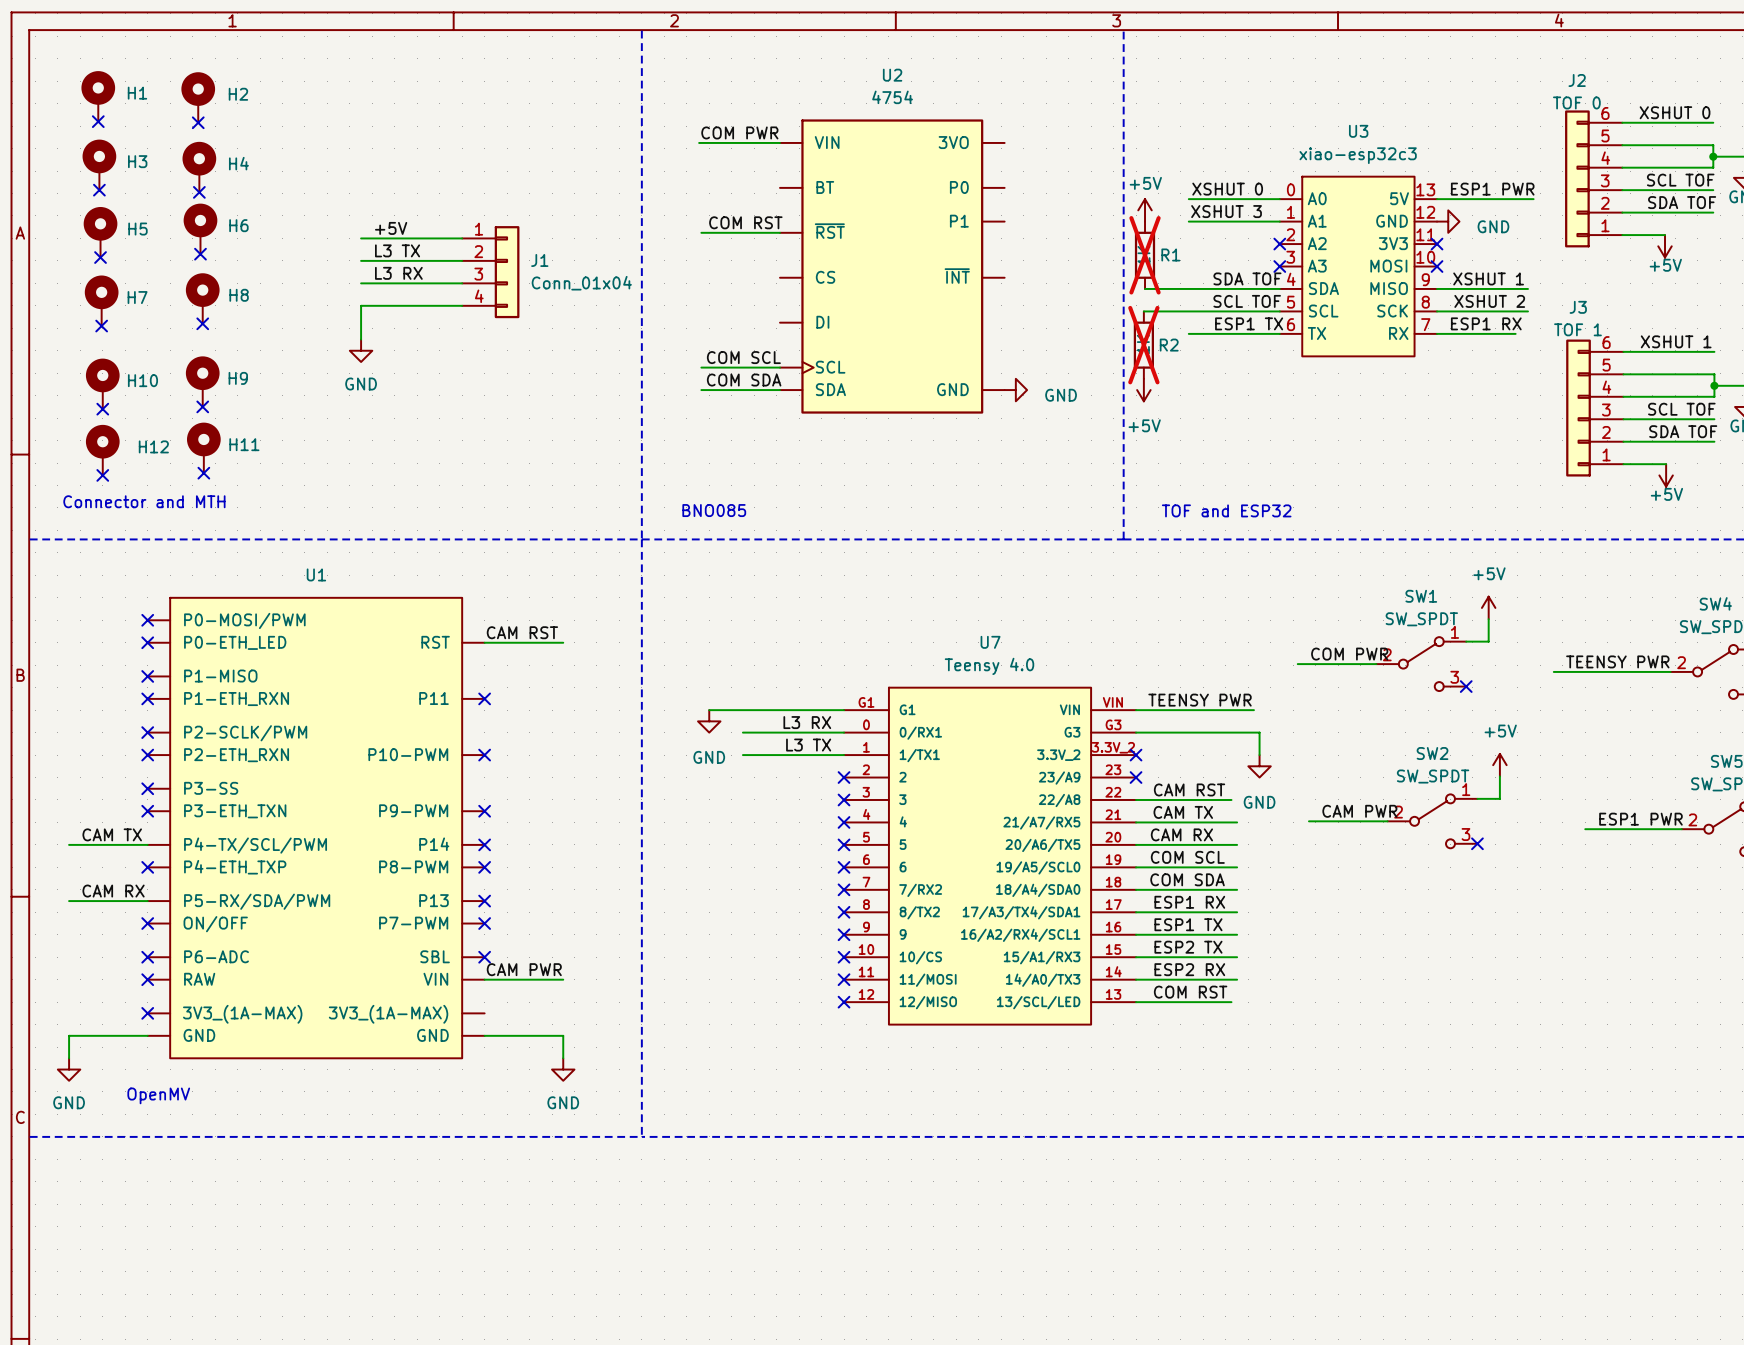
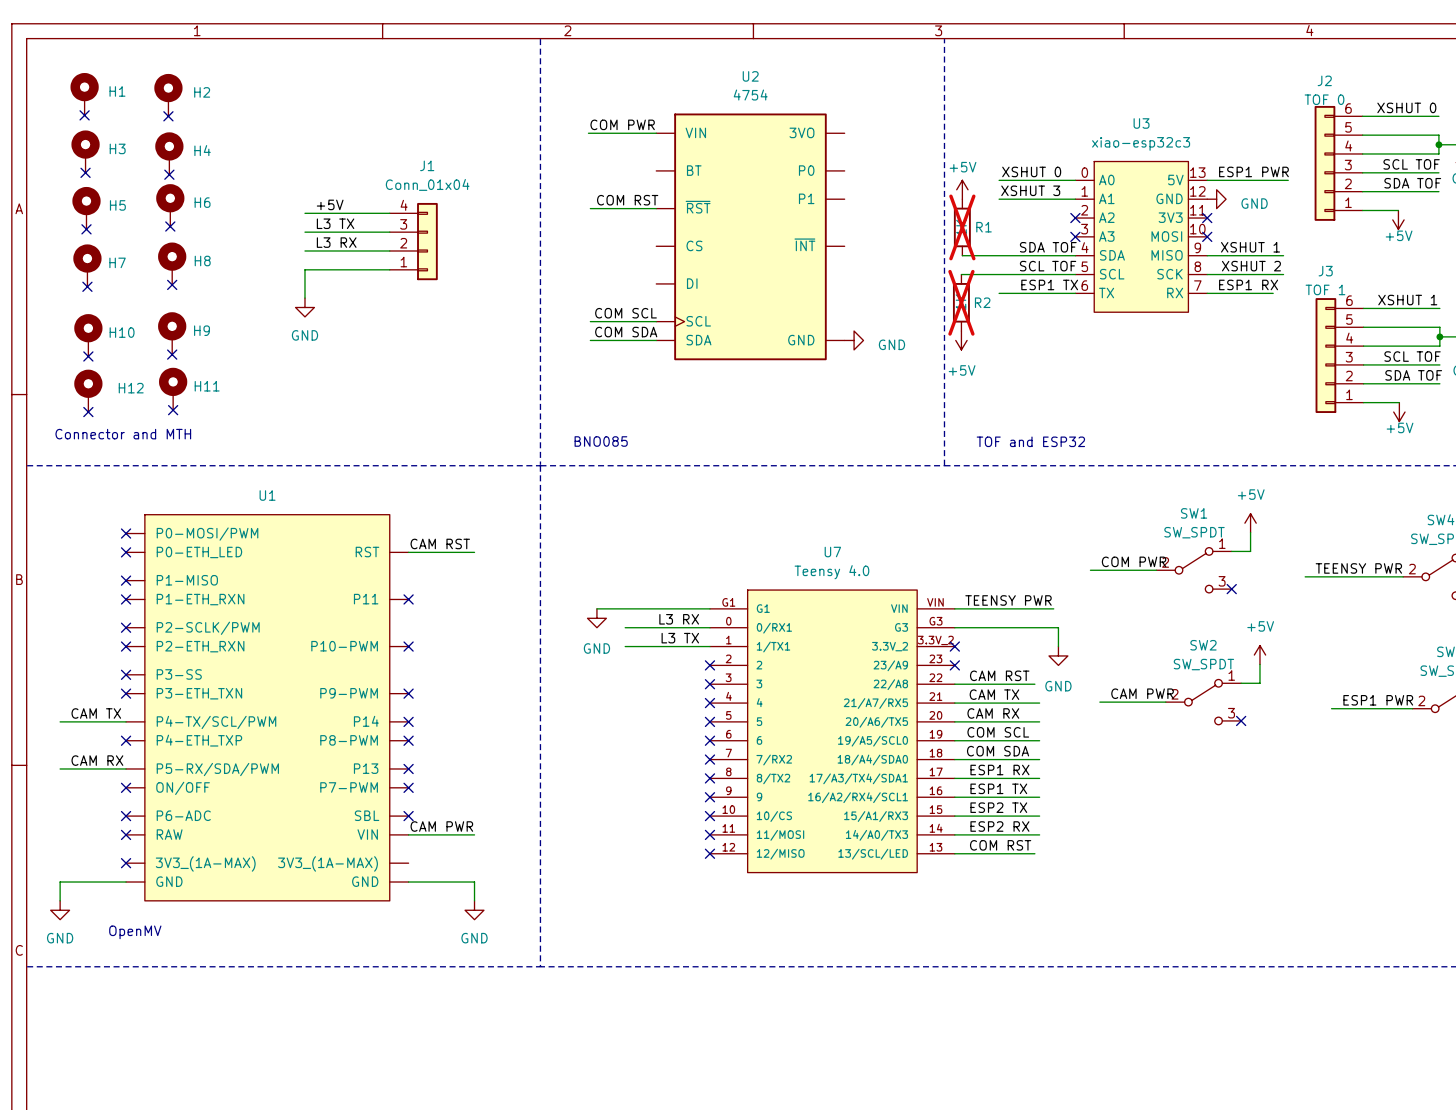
J1 name position: J1 (539, 260) -> J1 (427, 165)
J1 flip: as is (507, 272) -> up-down (427, 241)
J1 value position: Conn_01x04 (581, 283) -> Conn_01x04 (427, 184)

